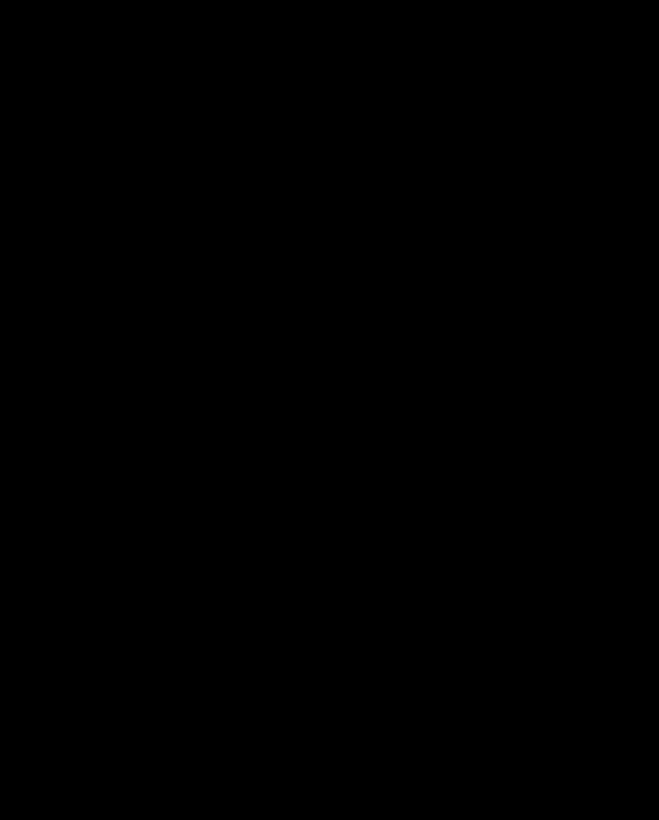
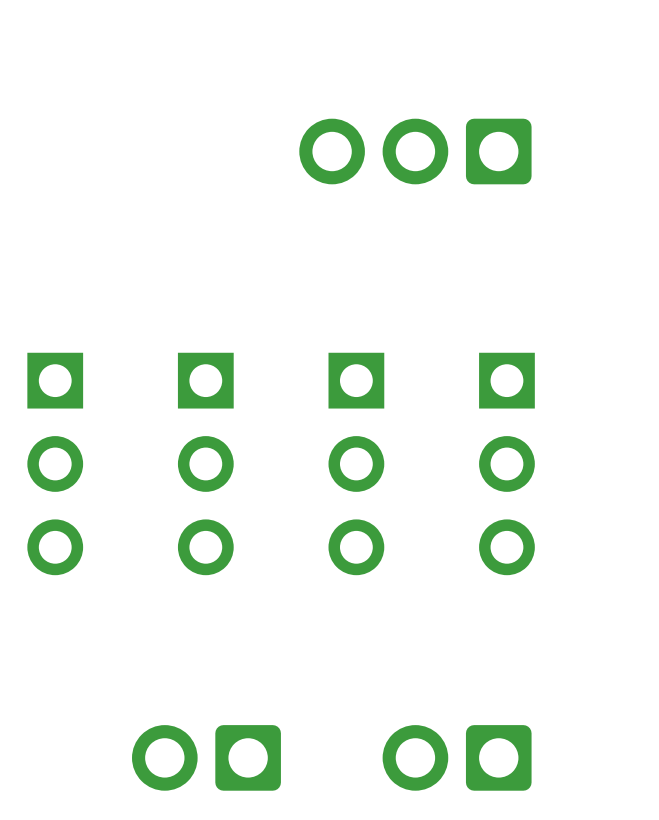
part: none -> (415, 151)
part: none -> (55, 463)
part: none -> (205, 463)
part: none -> (356, 463)
part: none -> (506, 463)
part: none -> (206, 757)
part: none -> (457, 757)

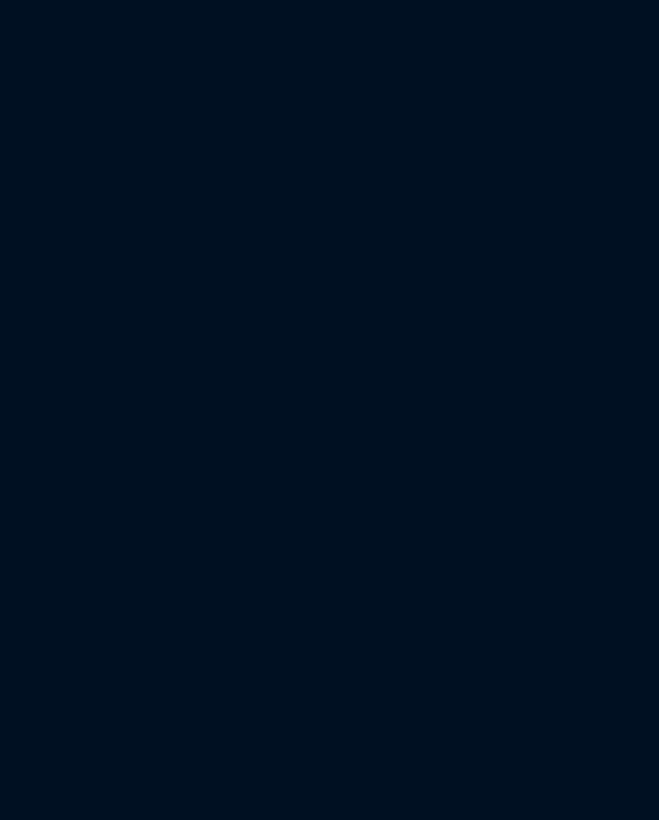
part: (415, 151) -> none
part: (55, 463) -> none
part: (205, 463) -> none
part: (356, 463) -> none
part: (506, 463) -> none
part: (206, 757) -> none
part: (457, 757) -> none

